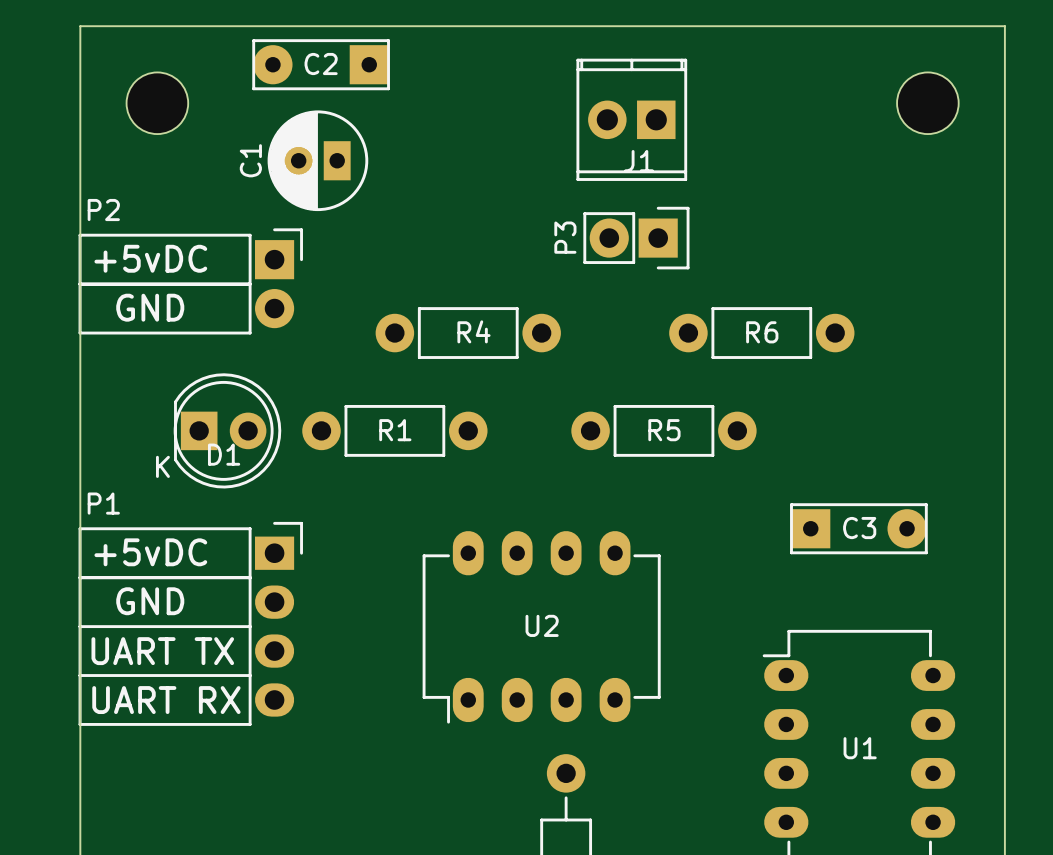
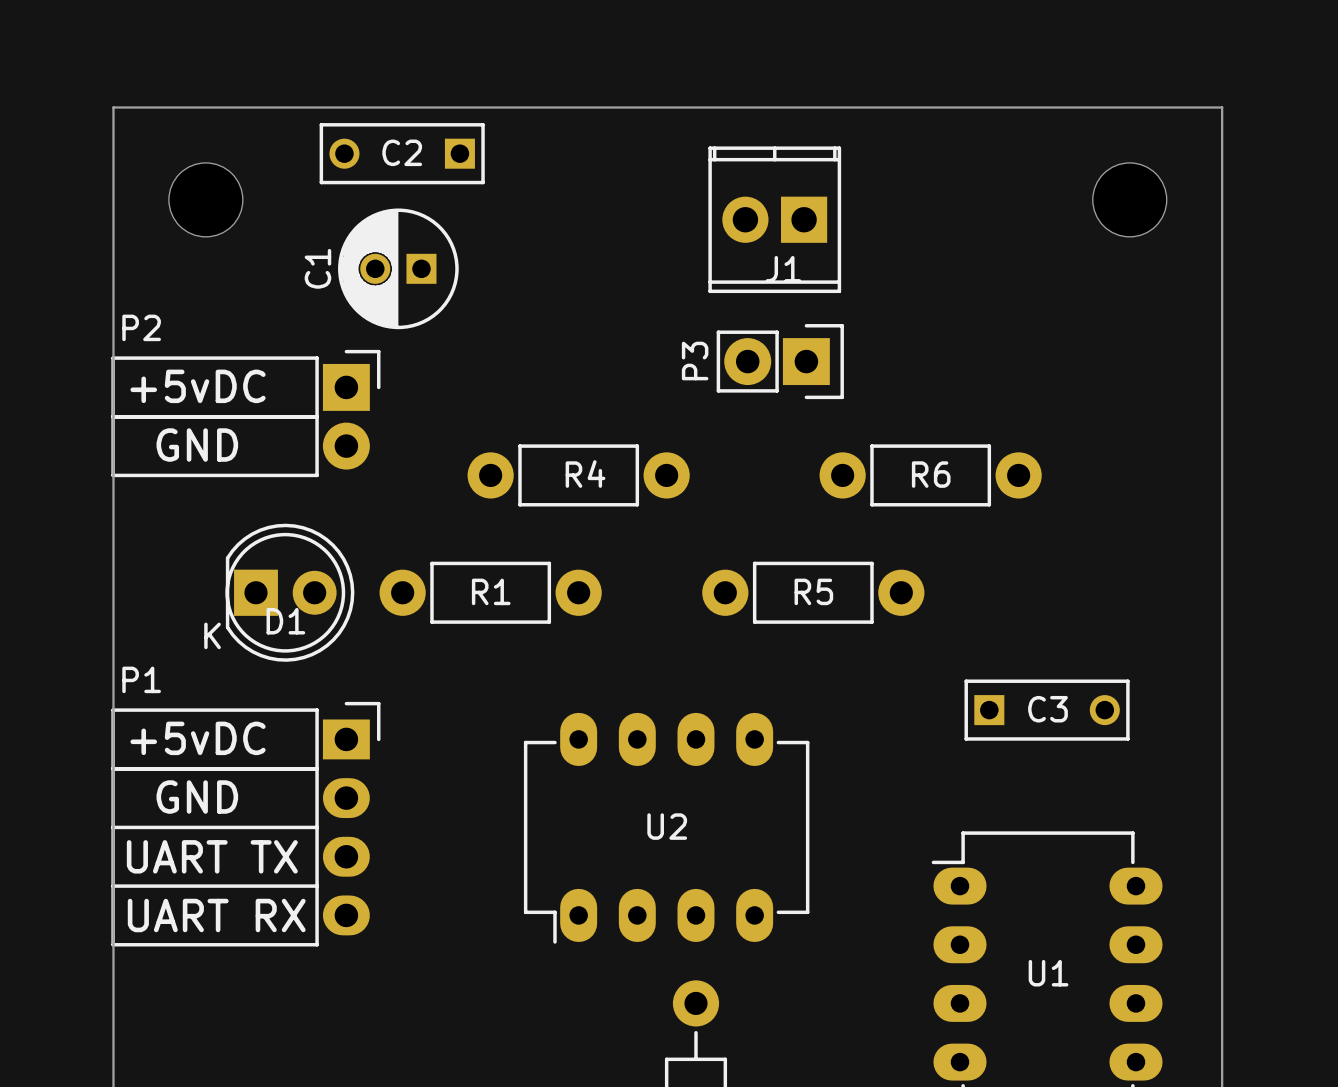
C2 footprint: [252, 39, 390, 91] -> [319, 123, 485, 185]
C1 footprint: [267, 110, 369, 212] -> [338, 208, 459, 330]
C3 footprint: [790, 503, 928, 555] -> [964, 679, 1130, 741]

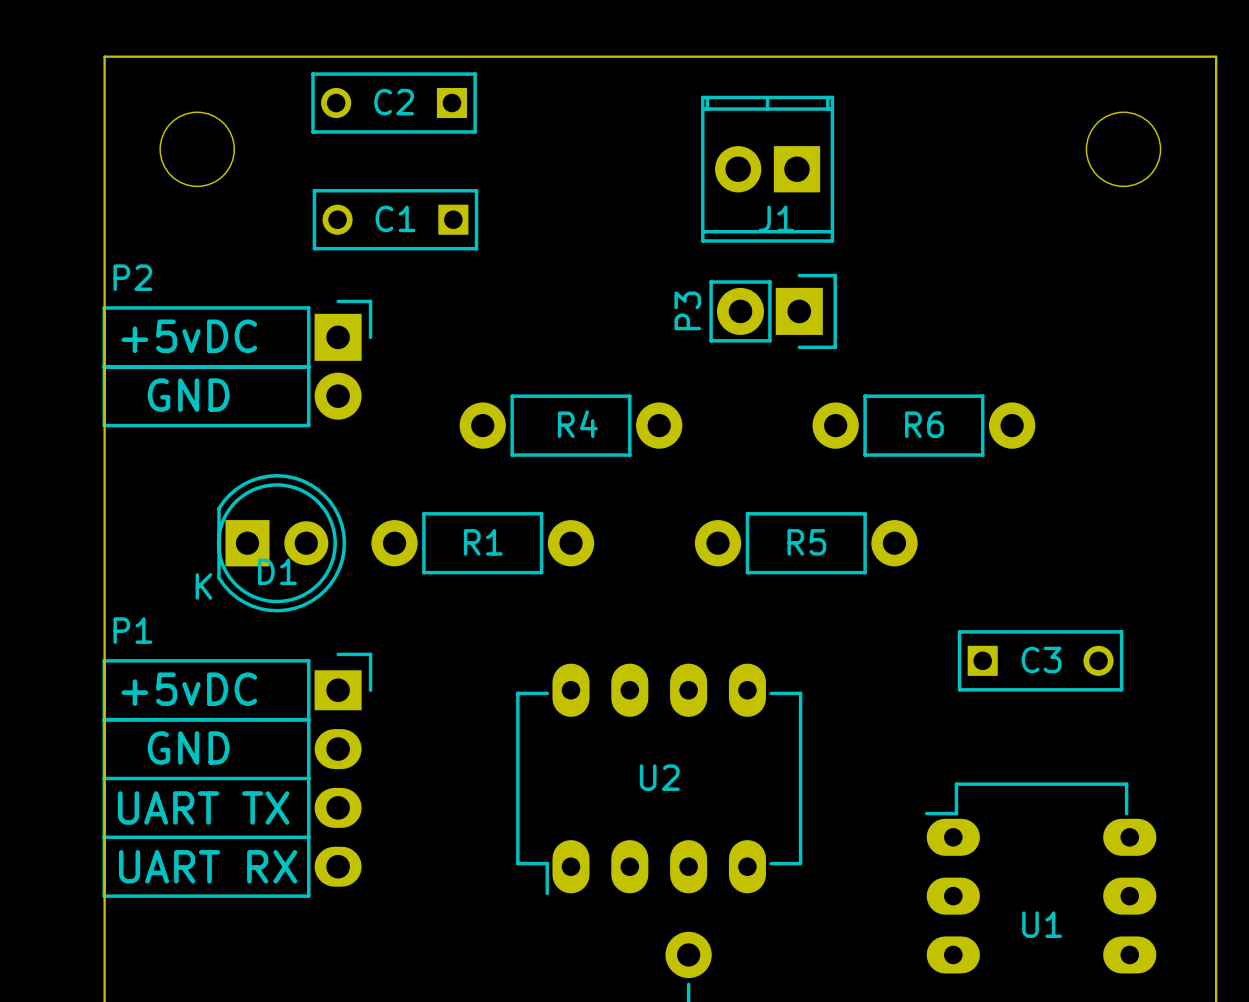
C1 footprint: [338, 208, 459, 330] -> [312, 189, 479, 251]
C1 name position: C1 (317, 268) -> C1 (395, 218)

